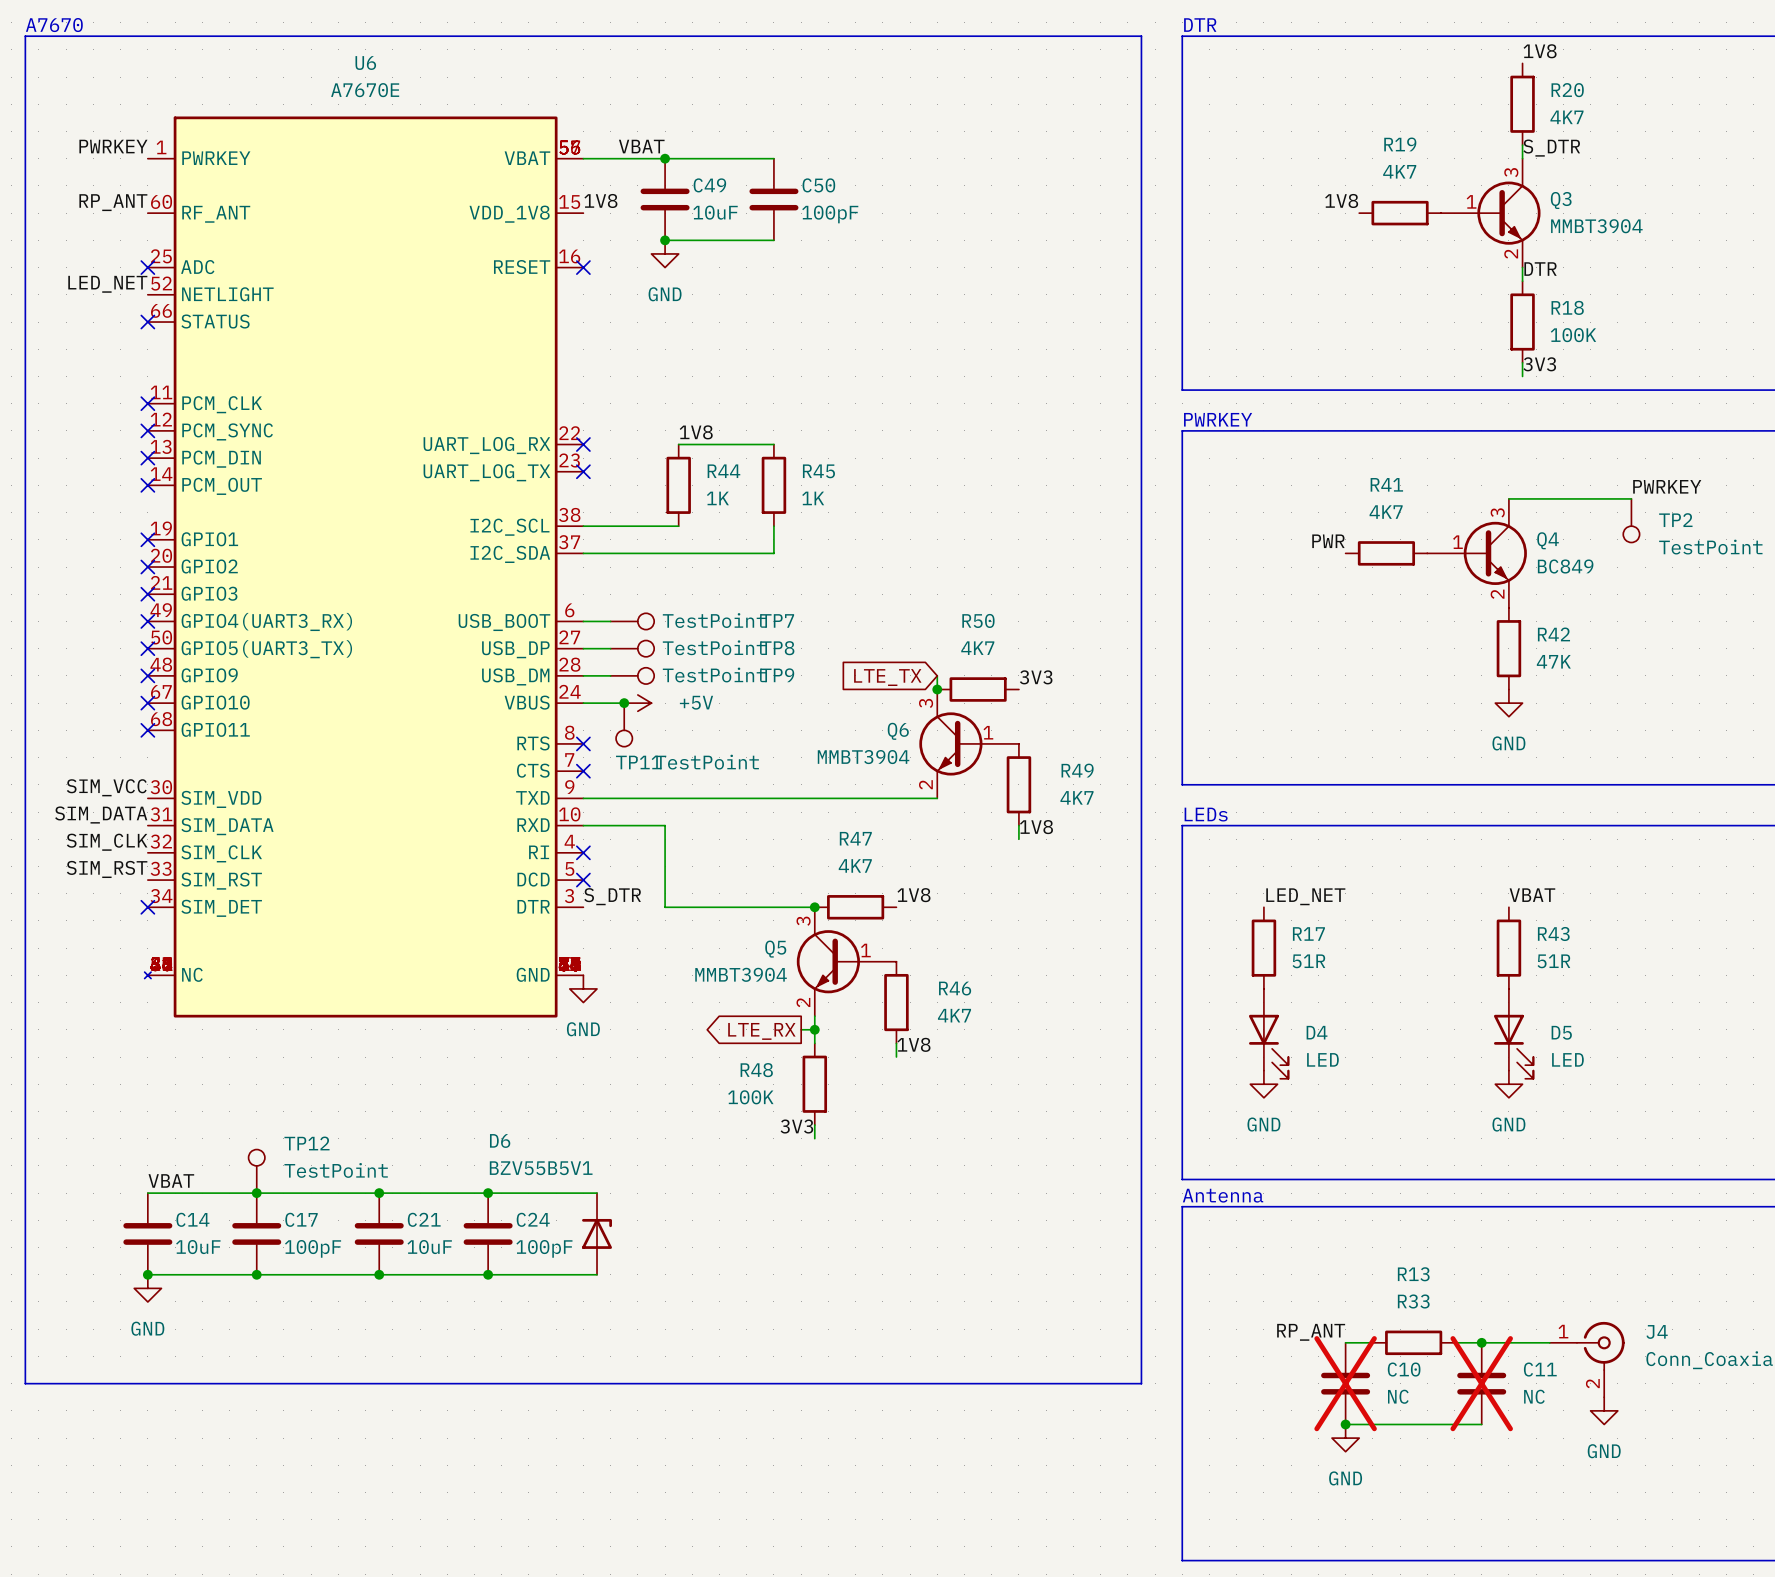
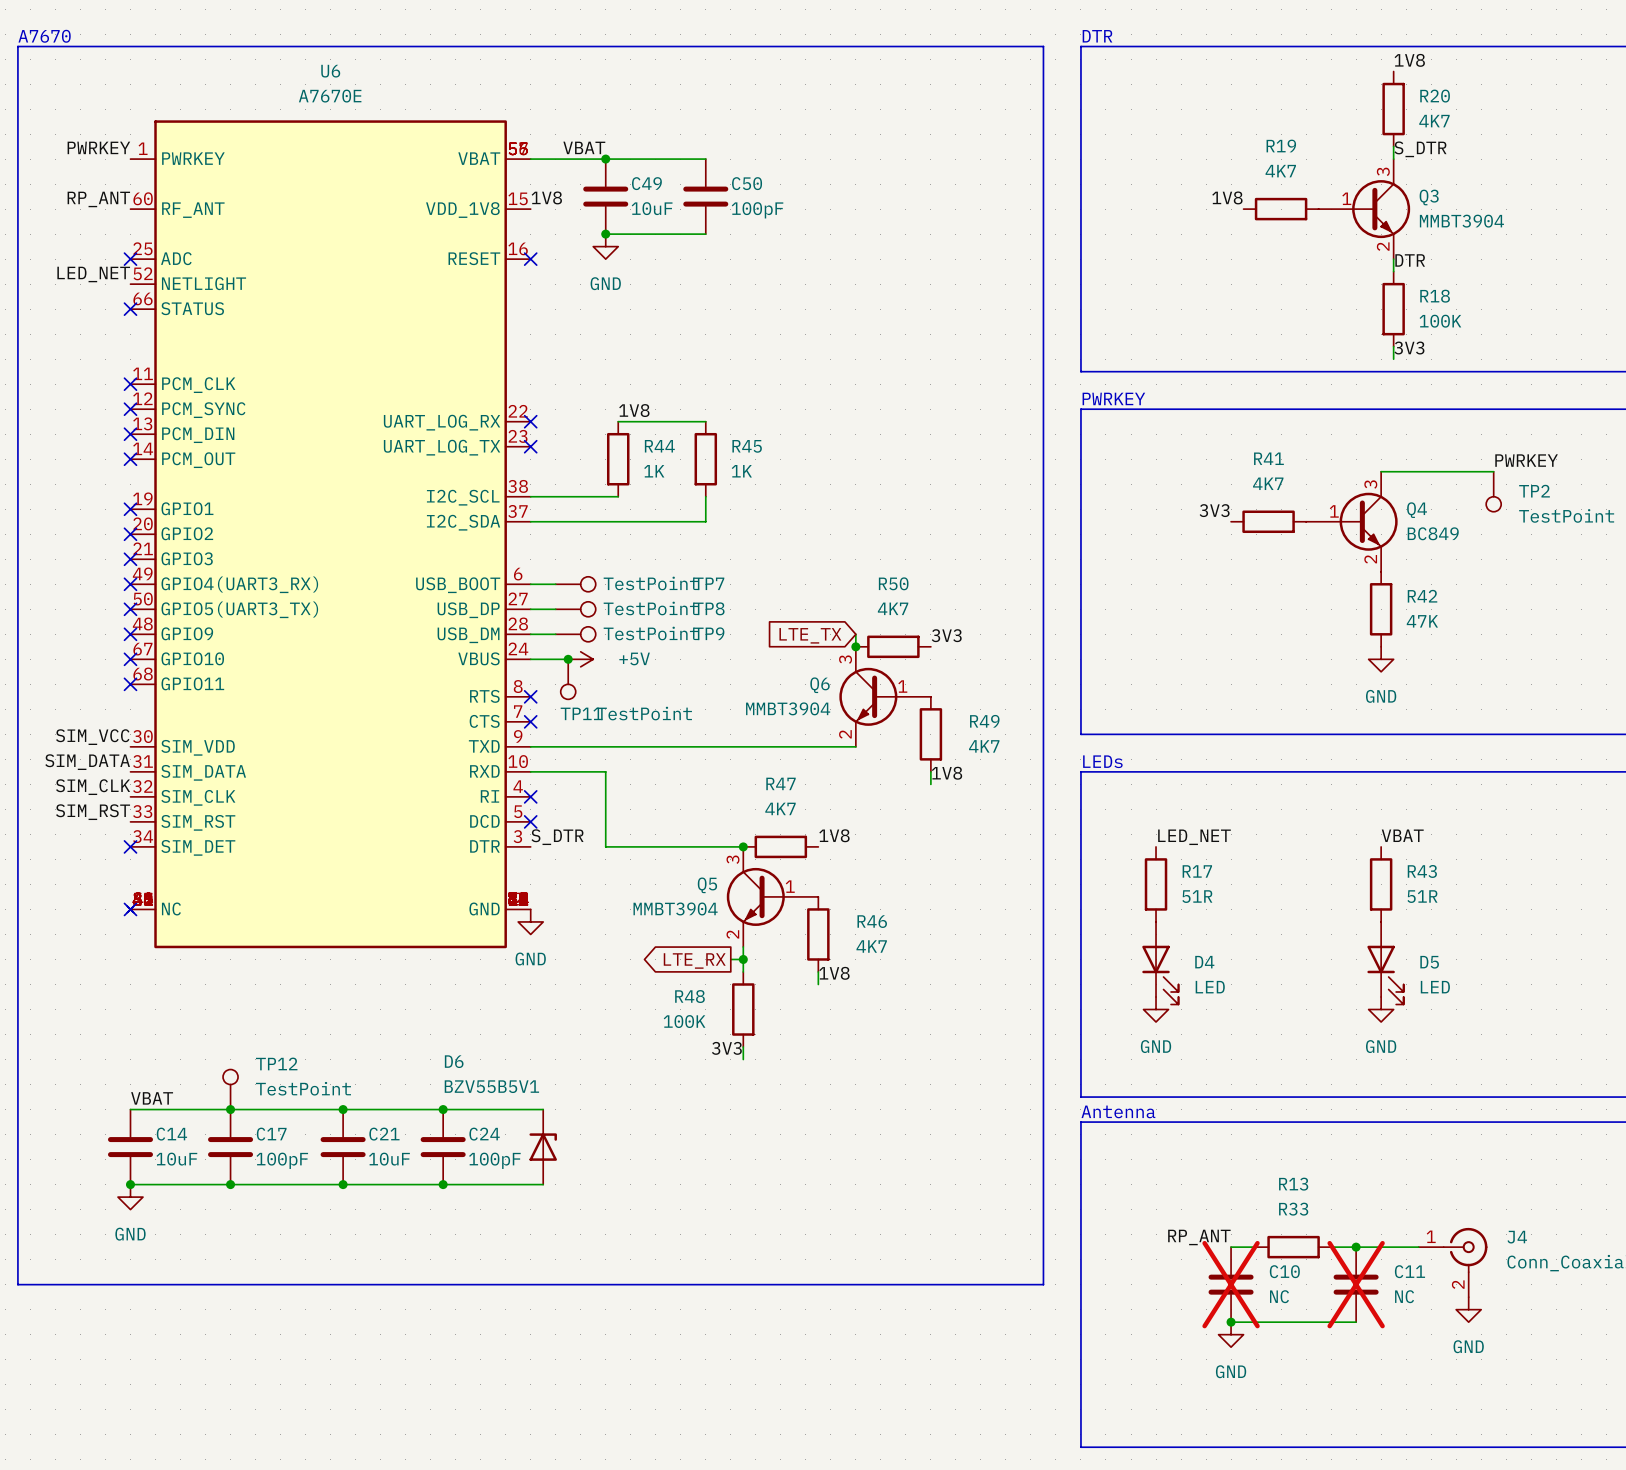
label: PWR (1328, 541) -> 3V3 (1214, 510)
no-connect mark: none -> (130, 909)

